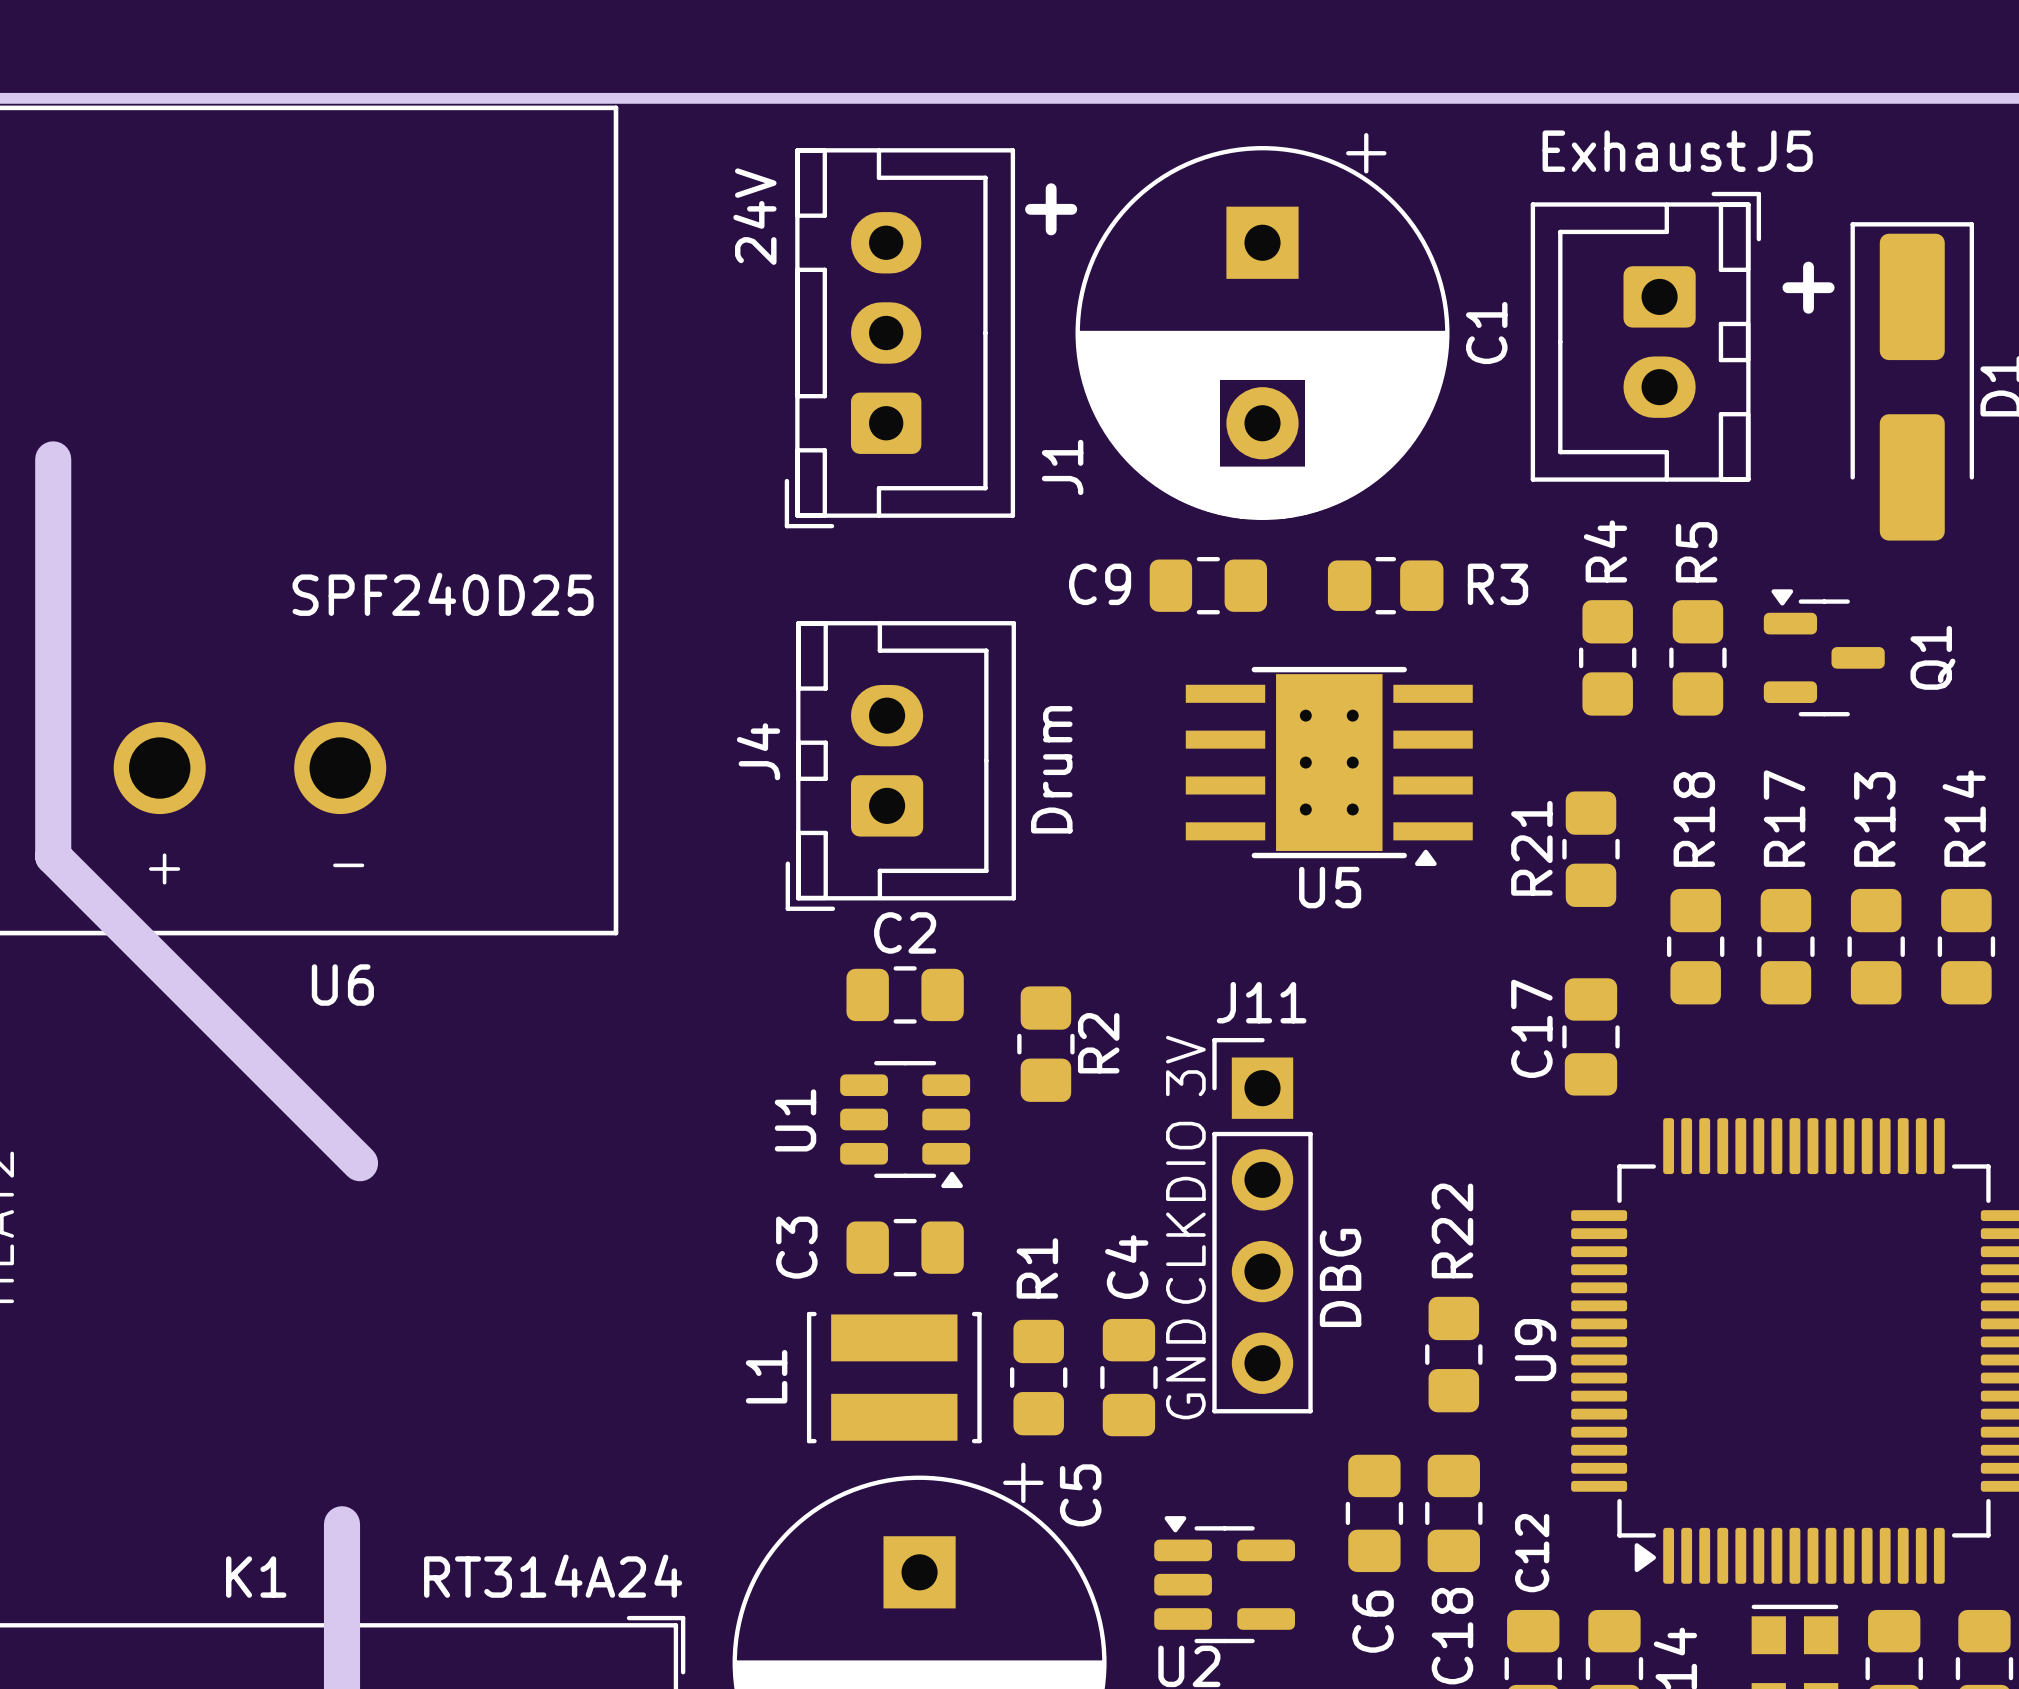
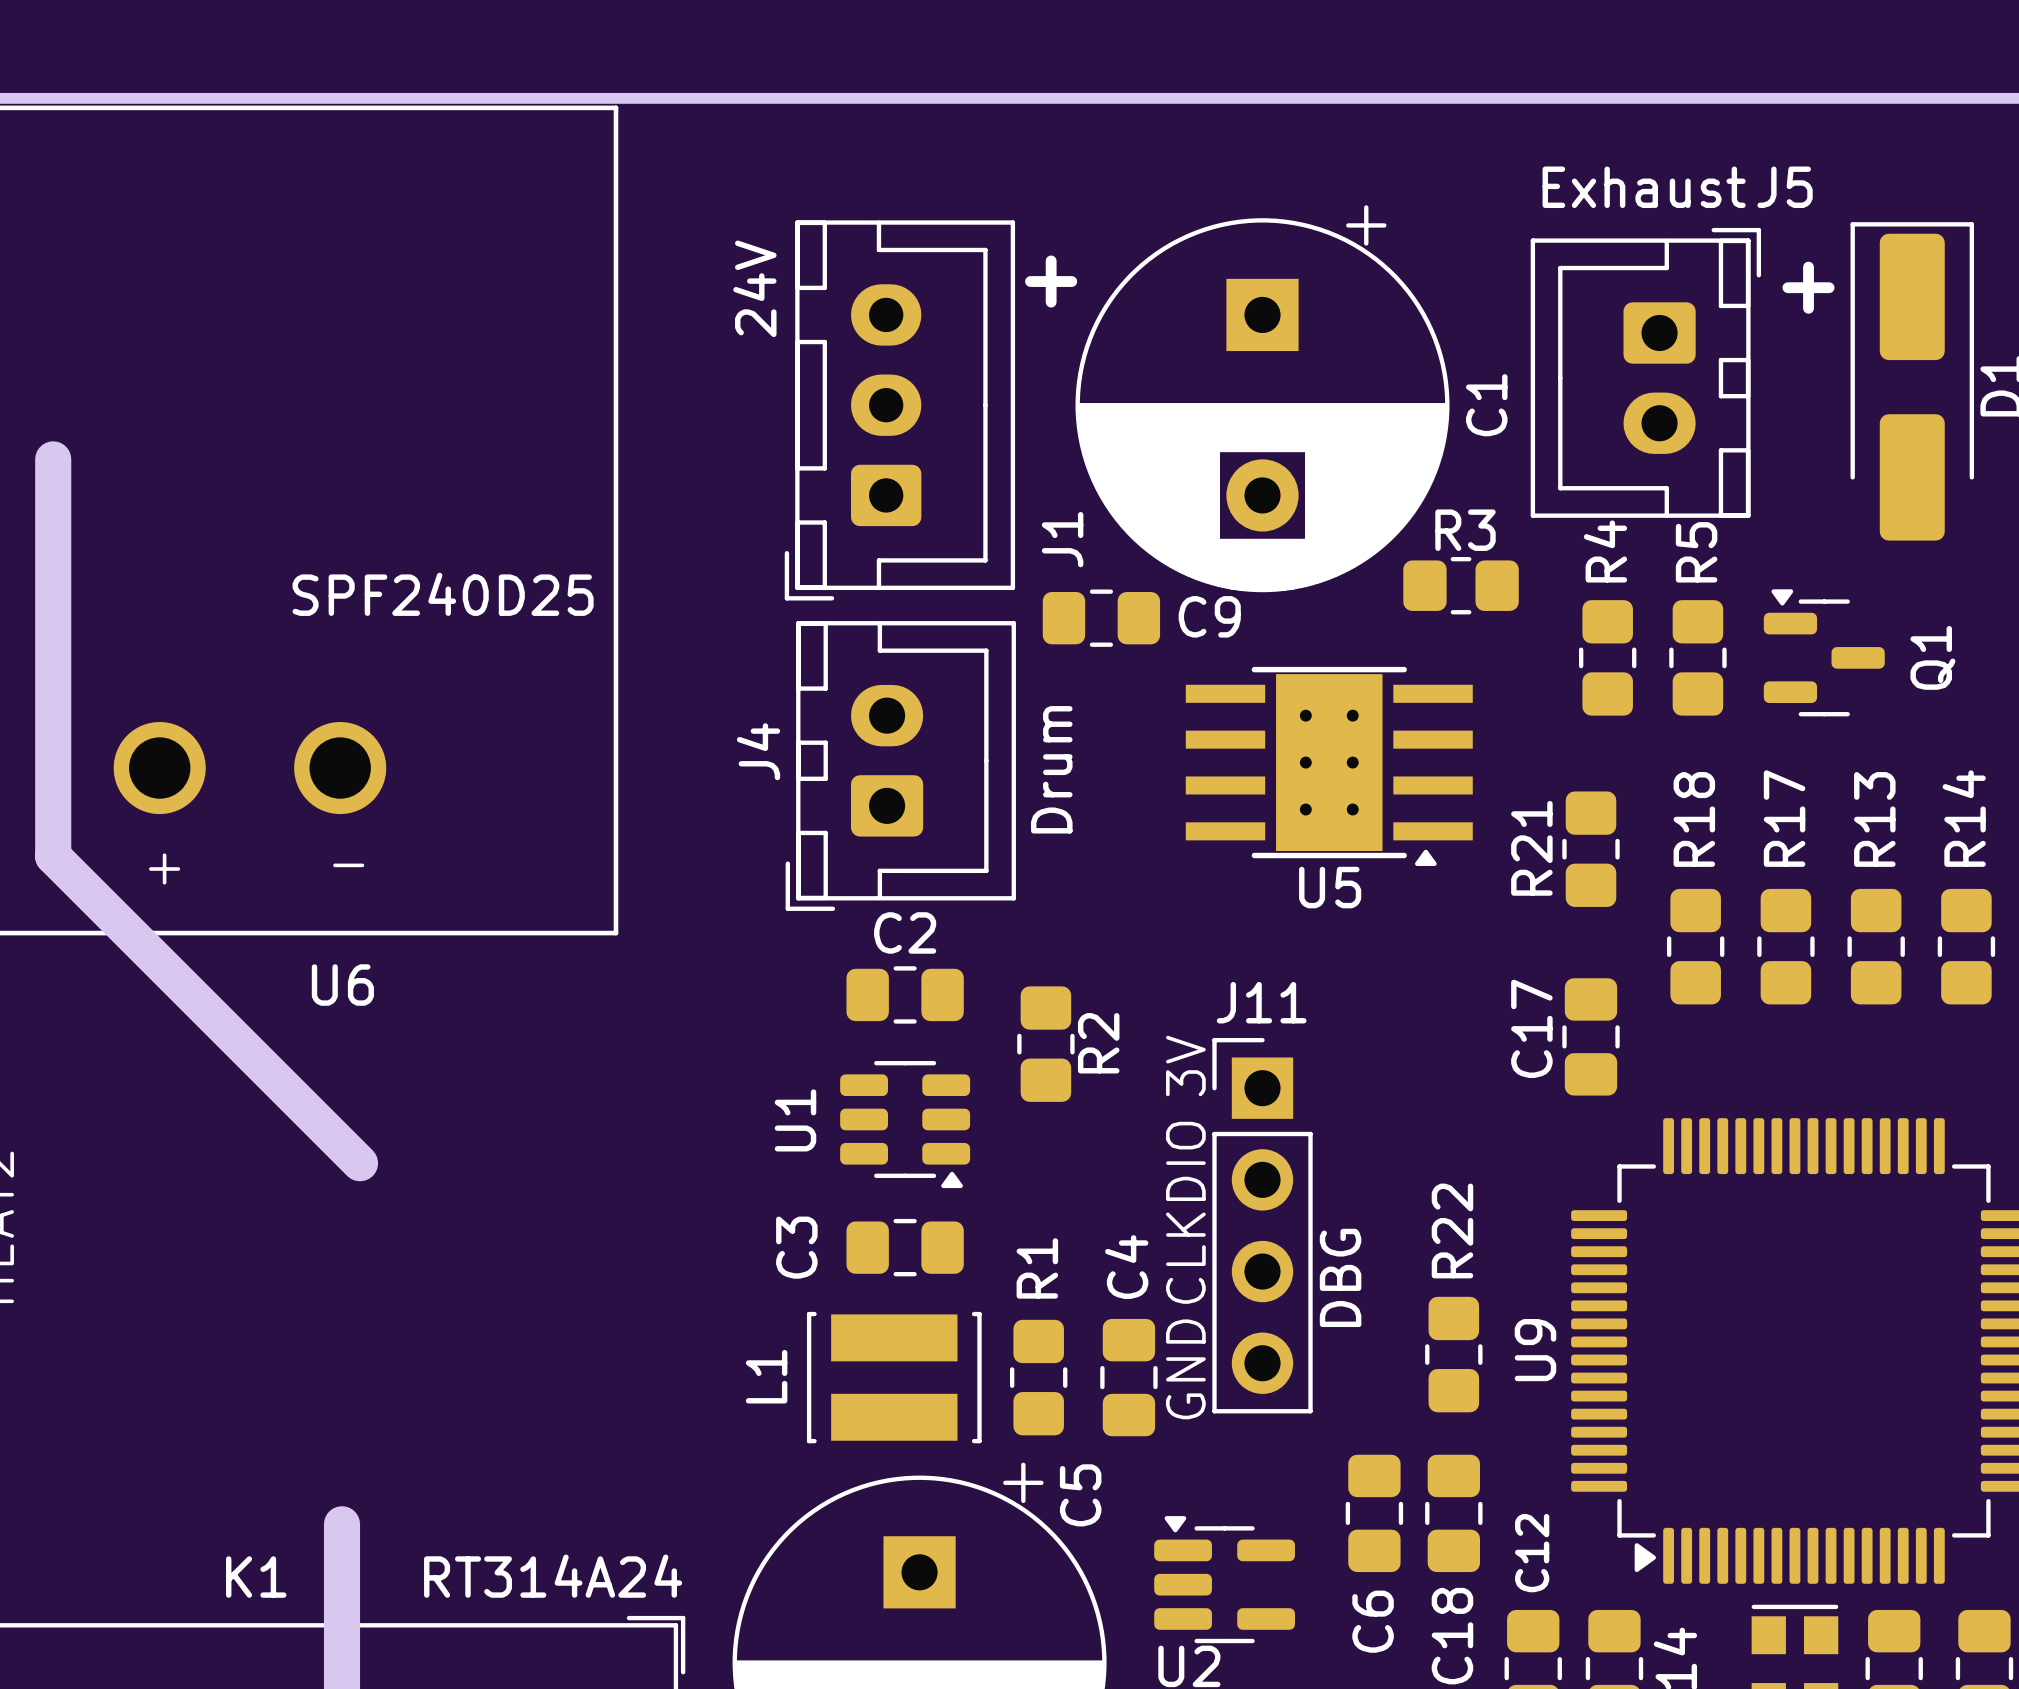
text position: + (1051, 209) -> + (1051, 281)
C1 position: (1262, 326) -> (1262, 398)
J5 position: (1645, 336) -> (1645, 372)
J1 position: (899, 338) -> (899, 410)
C9 name position: C9 (1100, 584) -> C9 (1209, 616)
R3 name position: R3 (1498, 584) -> R3 (1465, 530)
C9 position: (1208, 585) -> (1101, 618)
R3 position: (1385, 585) -> (1461, 585)

